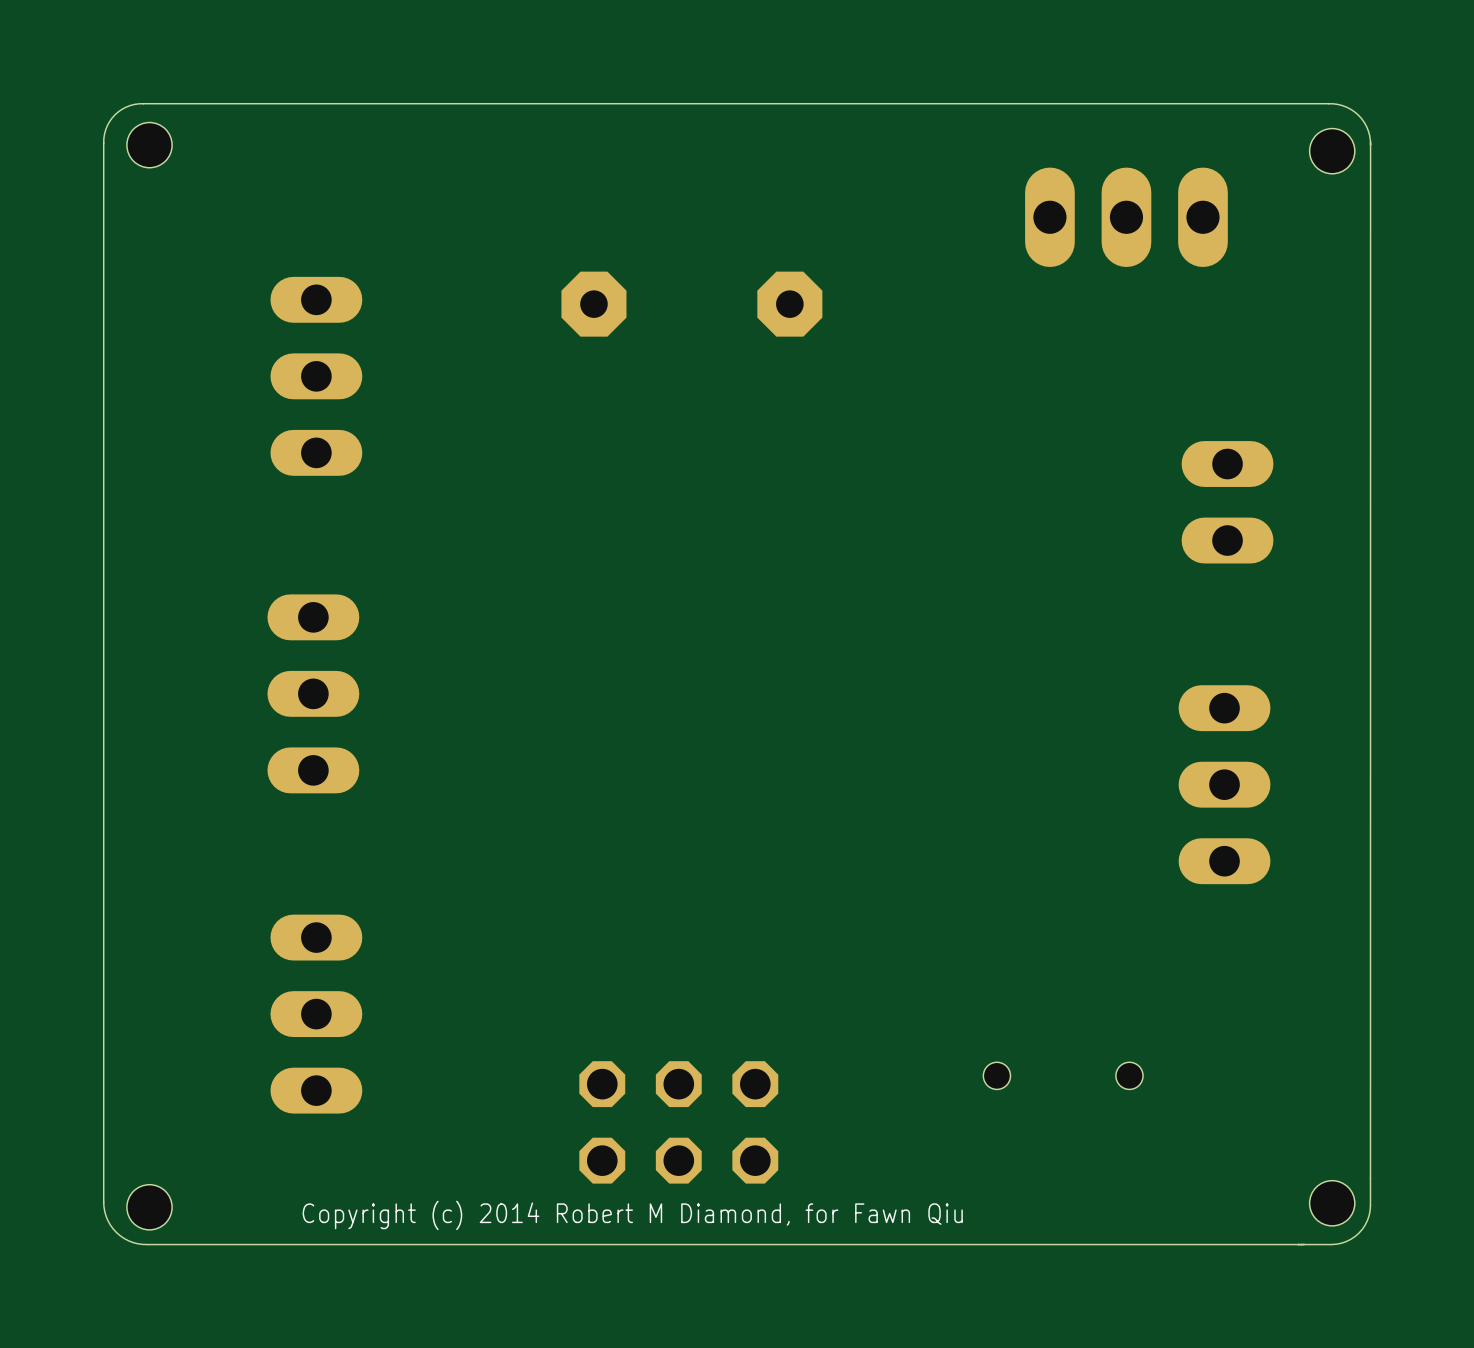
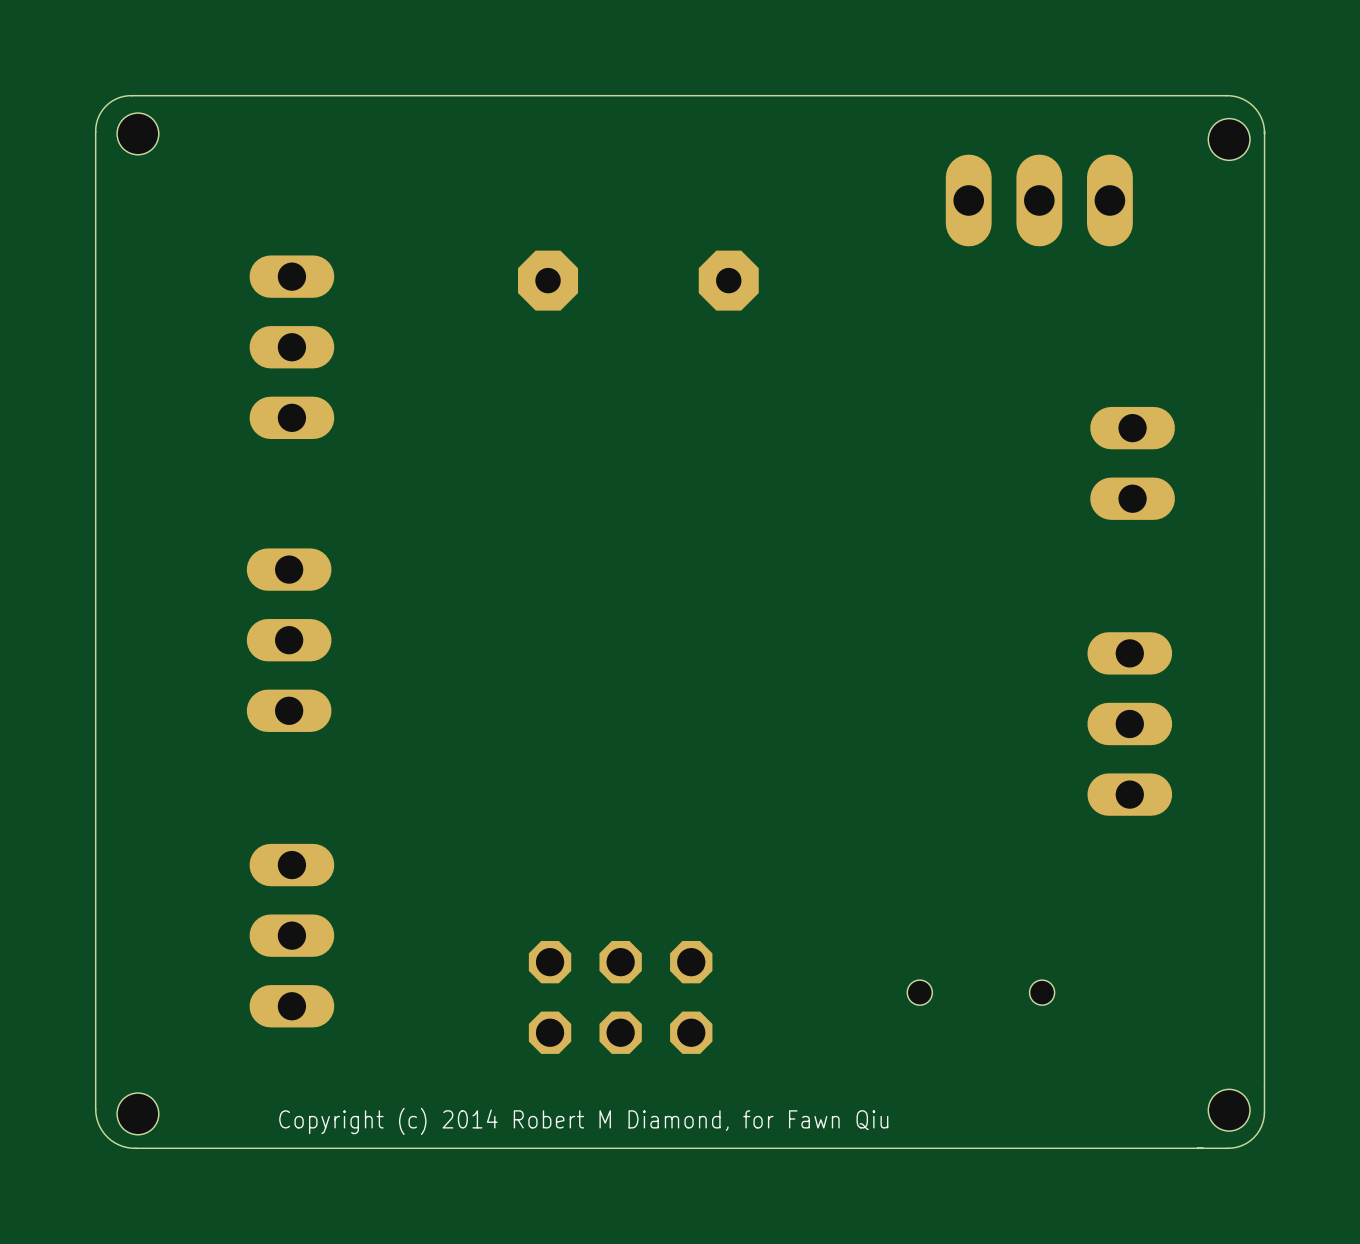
part position: (678, 1122) -> (620, 997)

